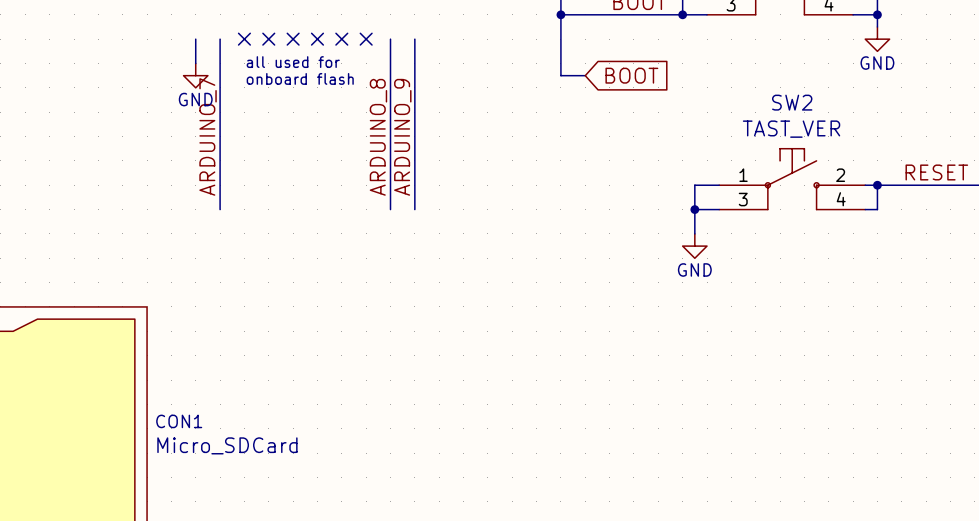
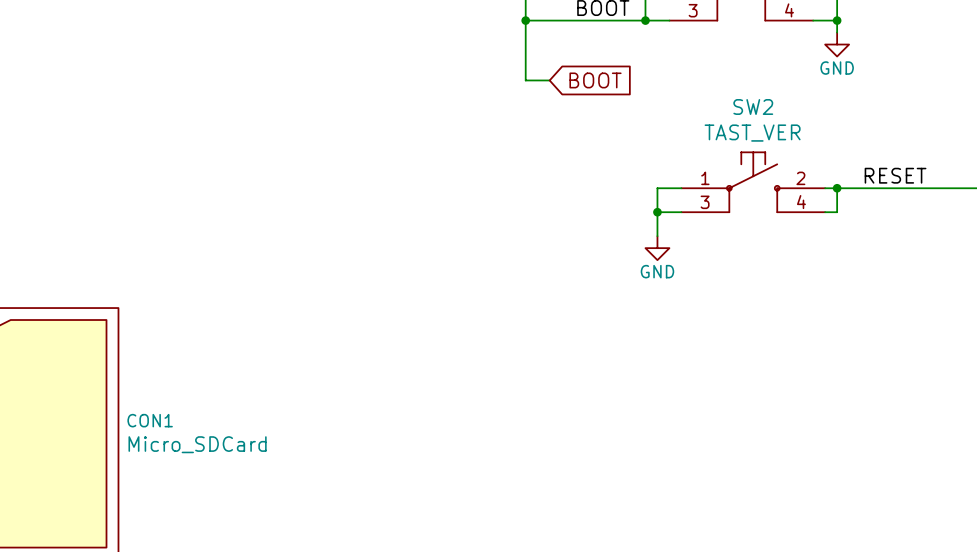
wire: (195, 39) (195, 63) -> none
wire: (220, 39) (220, 209) -> none
no-connect mark: (244, 39) -> none
no-connect mark: (268, 39) -> none
no-connect mark: (293, 39) -> none
no-connect mark: (317, 39) -> none
no-connect mark: (341, 39) -> none
no-connect mark: (366, 39) -> none
wire: (390, 39) (390, 209) -> none
wire: (414, 39) (414, 209) -> none
text: all used for (293, 62) -> none
power symbol: GND (195, 75) -> none
text: onboard flash (300, 78) -> none
label: ARDUINO_7 (208, 136) -> none
label: ARDUINO_8 (378, 137) -> none
label: ARDUINO_9 (402, 137) -> none

